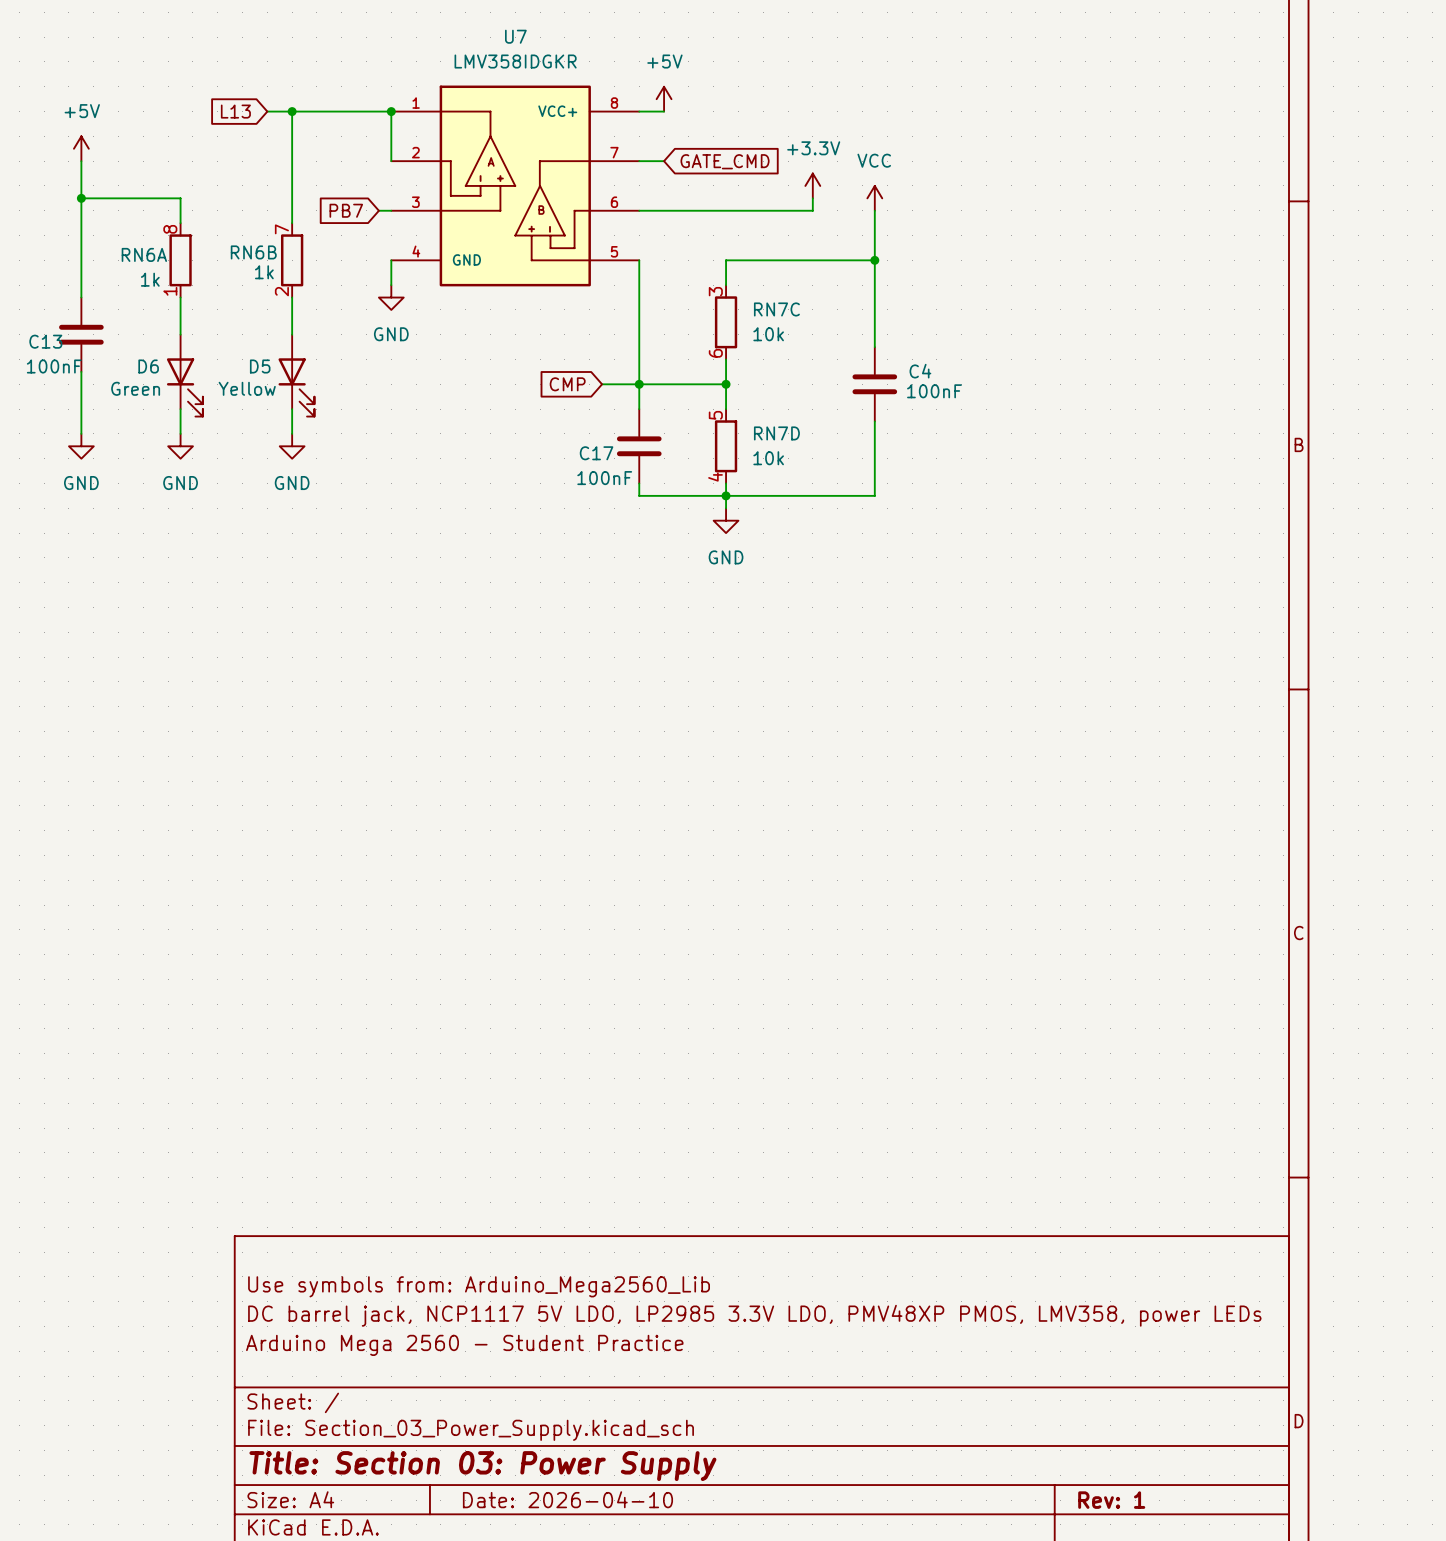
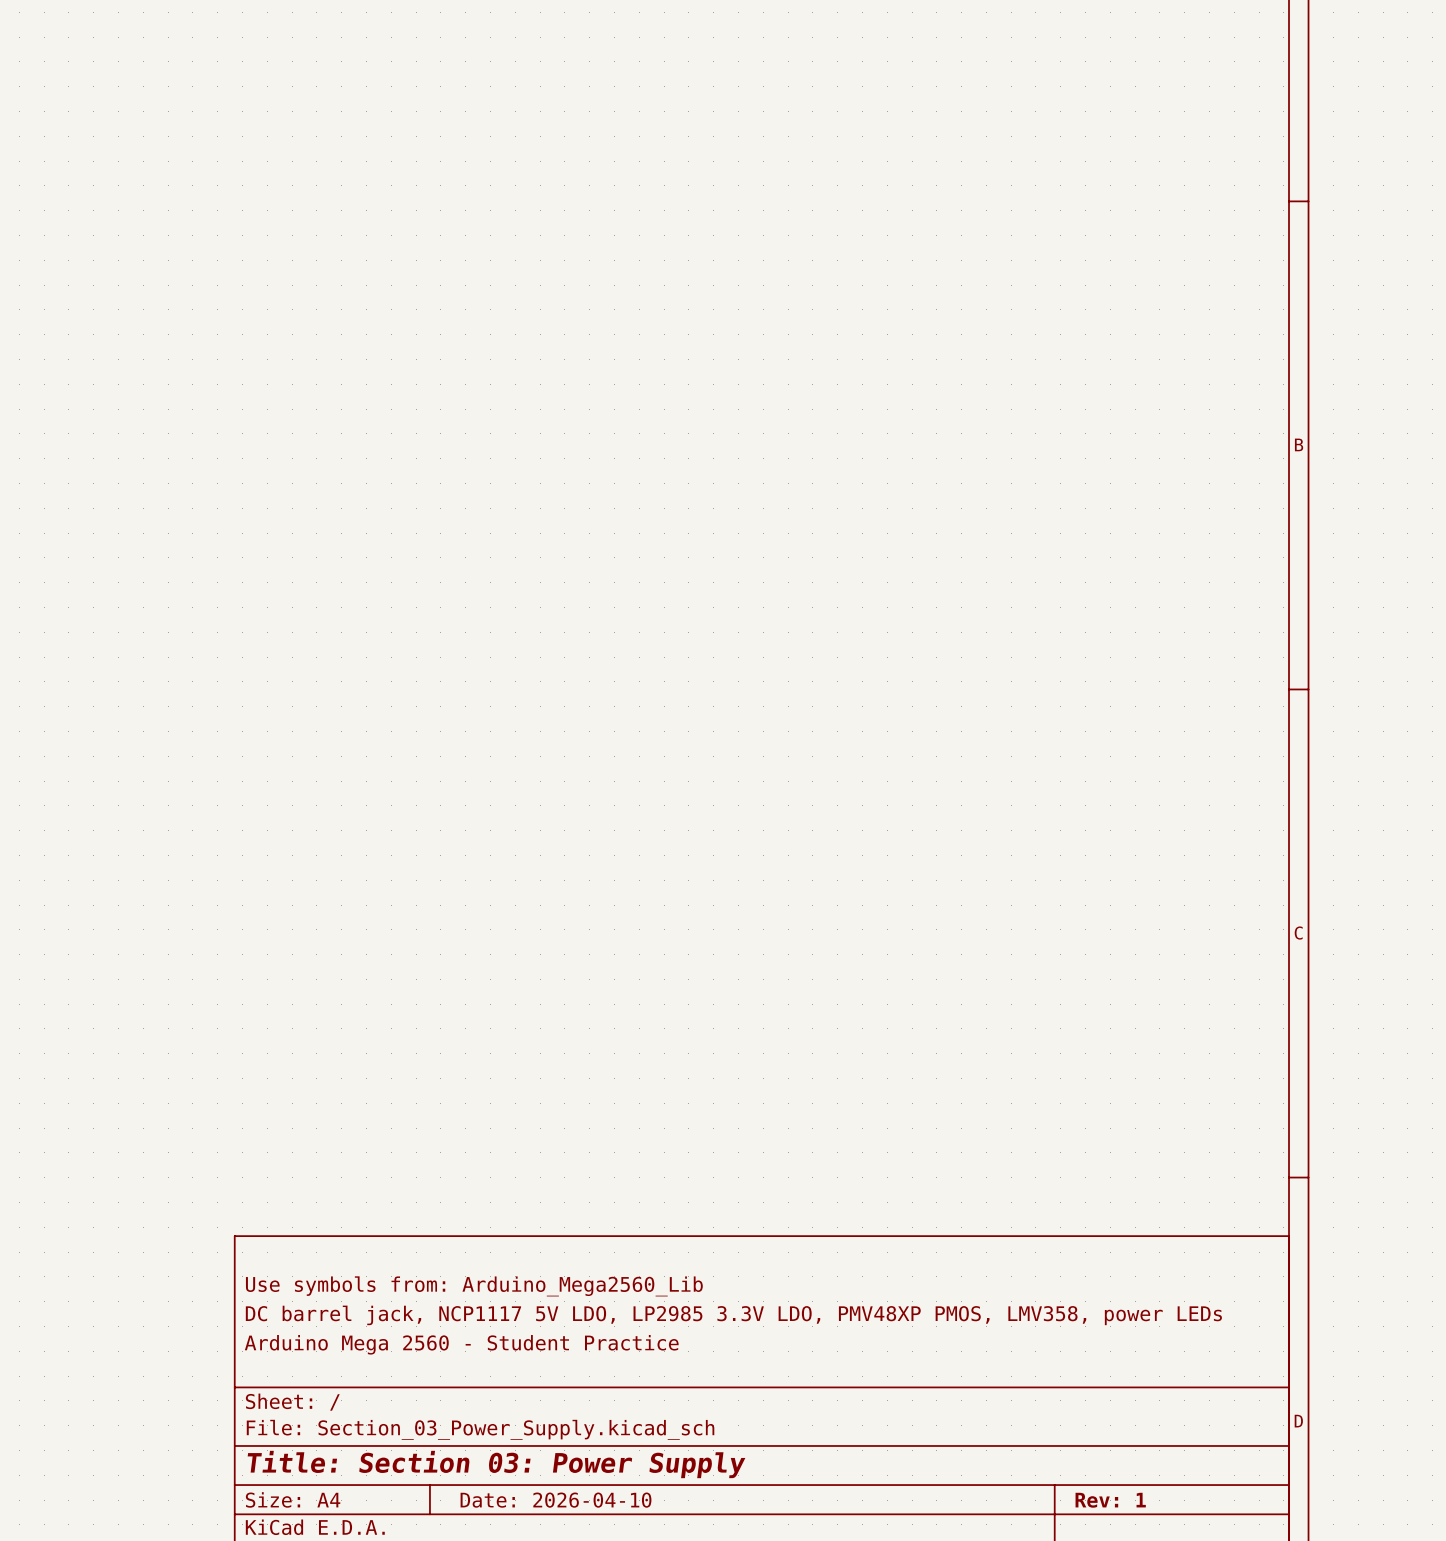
power symbol: +5V (664, 99) -> none
global label: L13 (235, 111) -> none
wire: (267, 111) (391, 111) (391, 161) -> none
wire: (292, 111) (292, 223) -> none
junction: (292, 111) -> none
junction: (391, 111) -> none
wire: (639, 111) (664, 111) -> none
power symbol: +5V (81, 148) -> none
wire: (81, 161) (81, 297) -> none
wire: (639, 161) (664, 161) -> none
global label: GATE_CMD (725, 161) -> none
U7: LMV358IDGKR (515, 185) -> none
power symbol: +3.3V (812, 185) -> none
wire: (81, 198) (180, 198) (180, 223) -> none
junction: (81, 198) -> none
wire: (812, 198) (812, 210) (639, 210) -> none
power symbol: VCC (874, 198) -> none
global label: PB7 (346, 210) -> none
wire: (378, 210) (391, 210) -> none
wire: (874, 210) (874, 347) -> none
RN6A: 1k (180, 260) -> none
RN6B: 1k (292, 260) -> none
wire: (391, 260) (391, 285) -> none
wire: (639, 260) (639, 409) -> none
wire: (874, 260) (726, 260) (726, 285) -> none
junction: (874, 260) -> none
wire: (180, 297) (180, 334) -> none
wire: (292, 297) (292, 334) -> none
power symbol: GND (391, 297) -> none
RN7C: 10k (726, 322) -> none
C13: 100nF (81, 334) -> none
wire: (726, 359) (726, 409) -> none
wire: (81, 371) (81, 433) -> none
D6: Green (184, 375) -> none
D5: Yellow (296, 375) -> none
global label: CMP (567, 384) -> none
wire: (602, 384) (726, 384) -> none
junction: (639, 384) -> none
junction: (726, 384) -> none
C4: 100nF (874, 384) -> none
wire: (180, 409) (180, 433) -> none
wire: (292, 409) (292, 433) -> none
wire: (874, 421) (874, 495) (639, 495) (639, 483) -> none
power symbol: GND (81, 446) -> none
power symbol: GND (180, 446) -> none
power symbol: GND (292, 446) -> none
C17: 100nF (639, 446) -> none
RN7D: 10k (726, 446) -> none
wire: (726, 483) (726, 508) -> none
junction: (726, 495) -> none
power symbol: GND (726, 520) -> none

